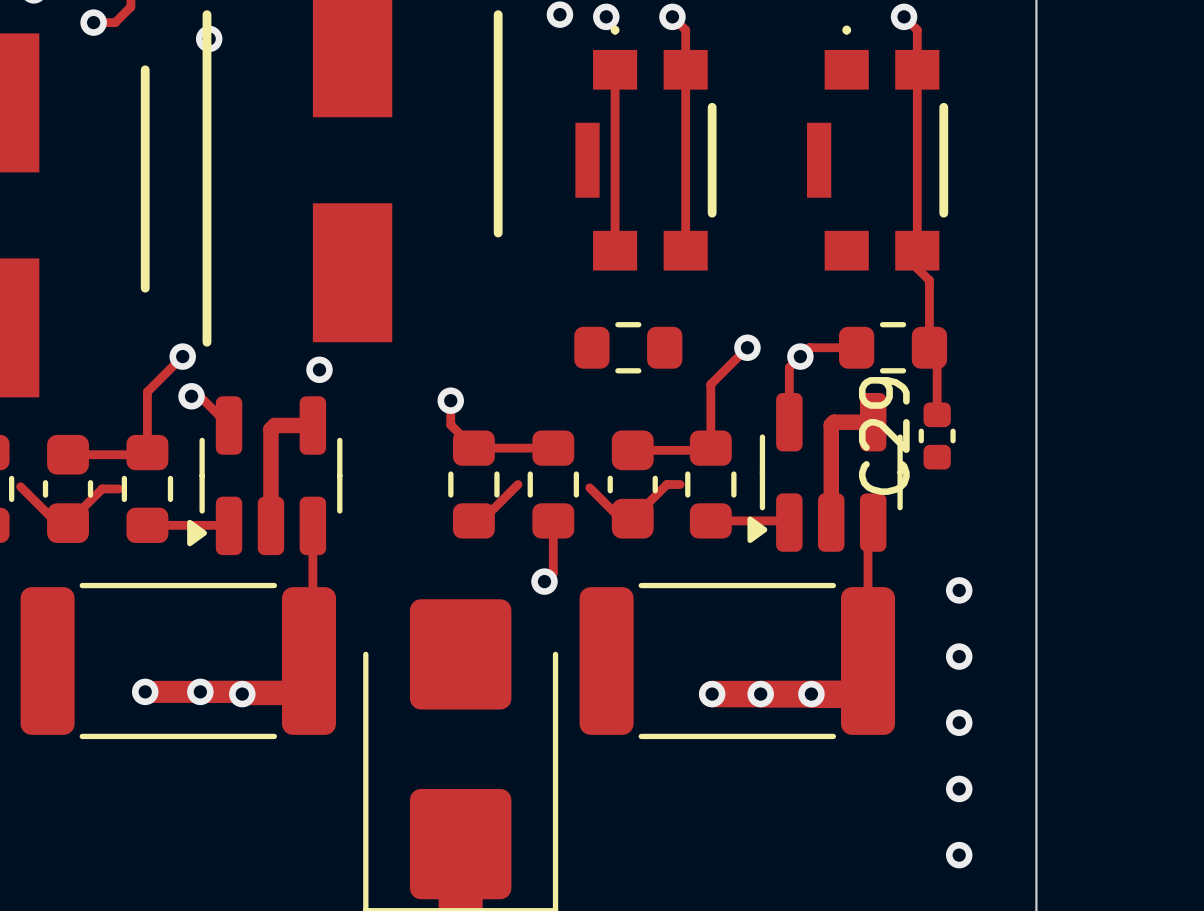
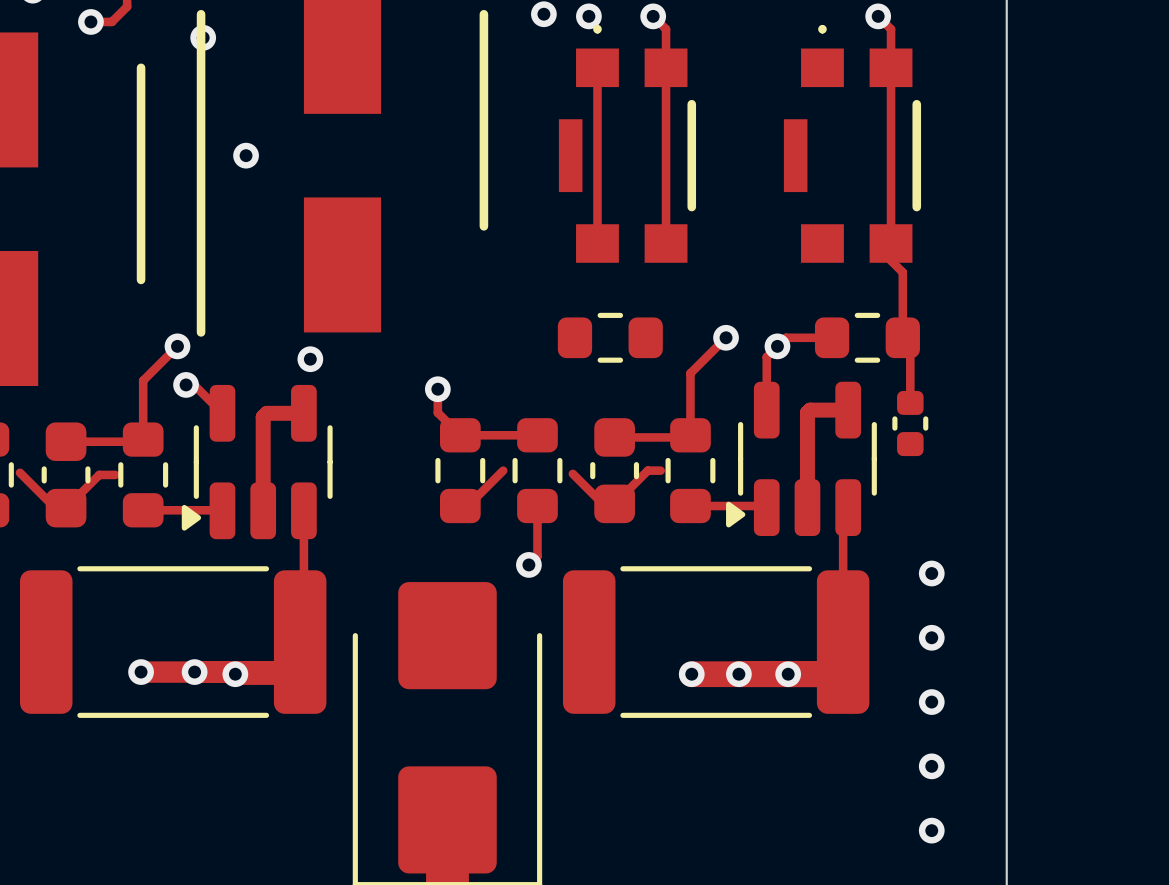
via: none -> (246, 155)
C29 name: C29 (884, 435) -> none

